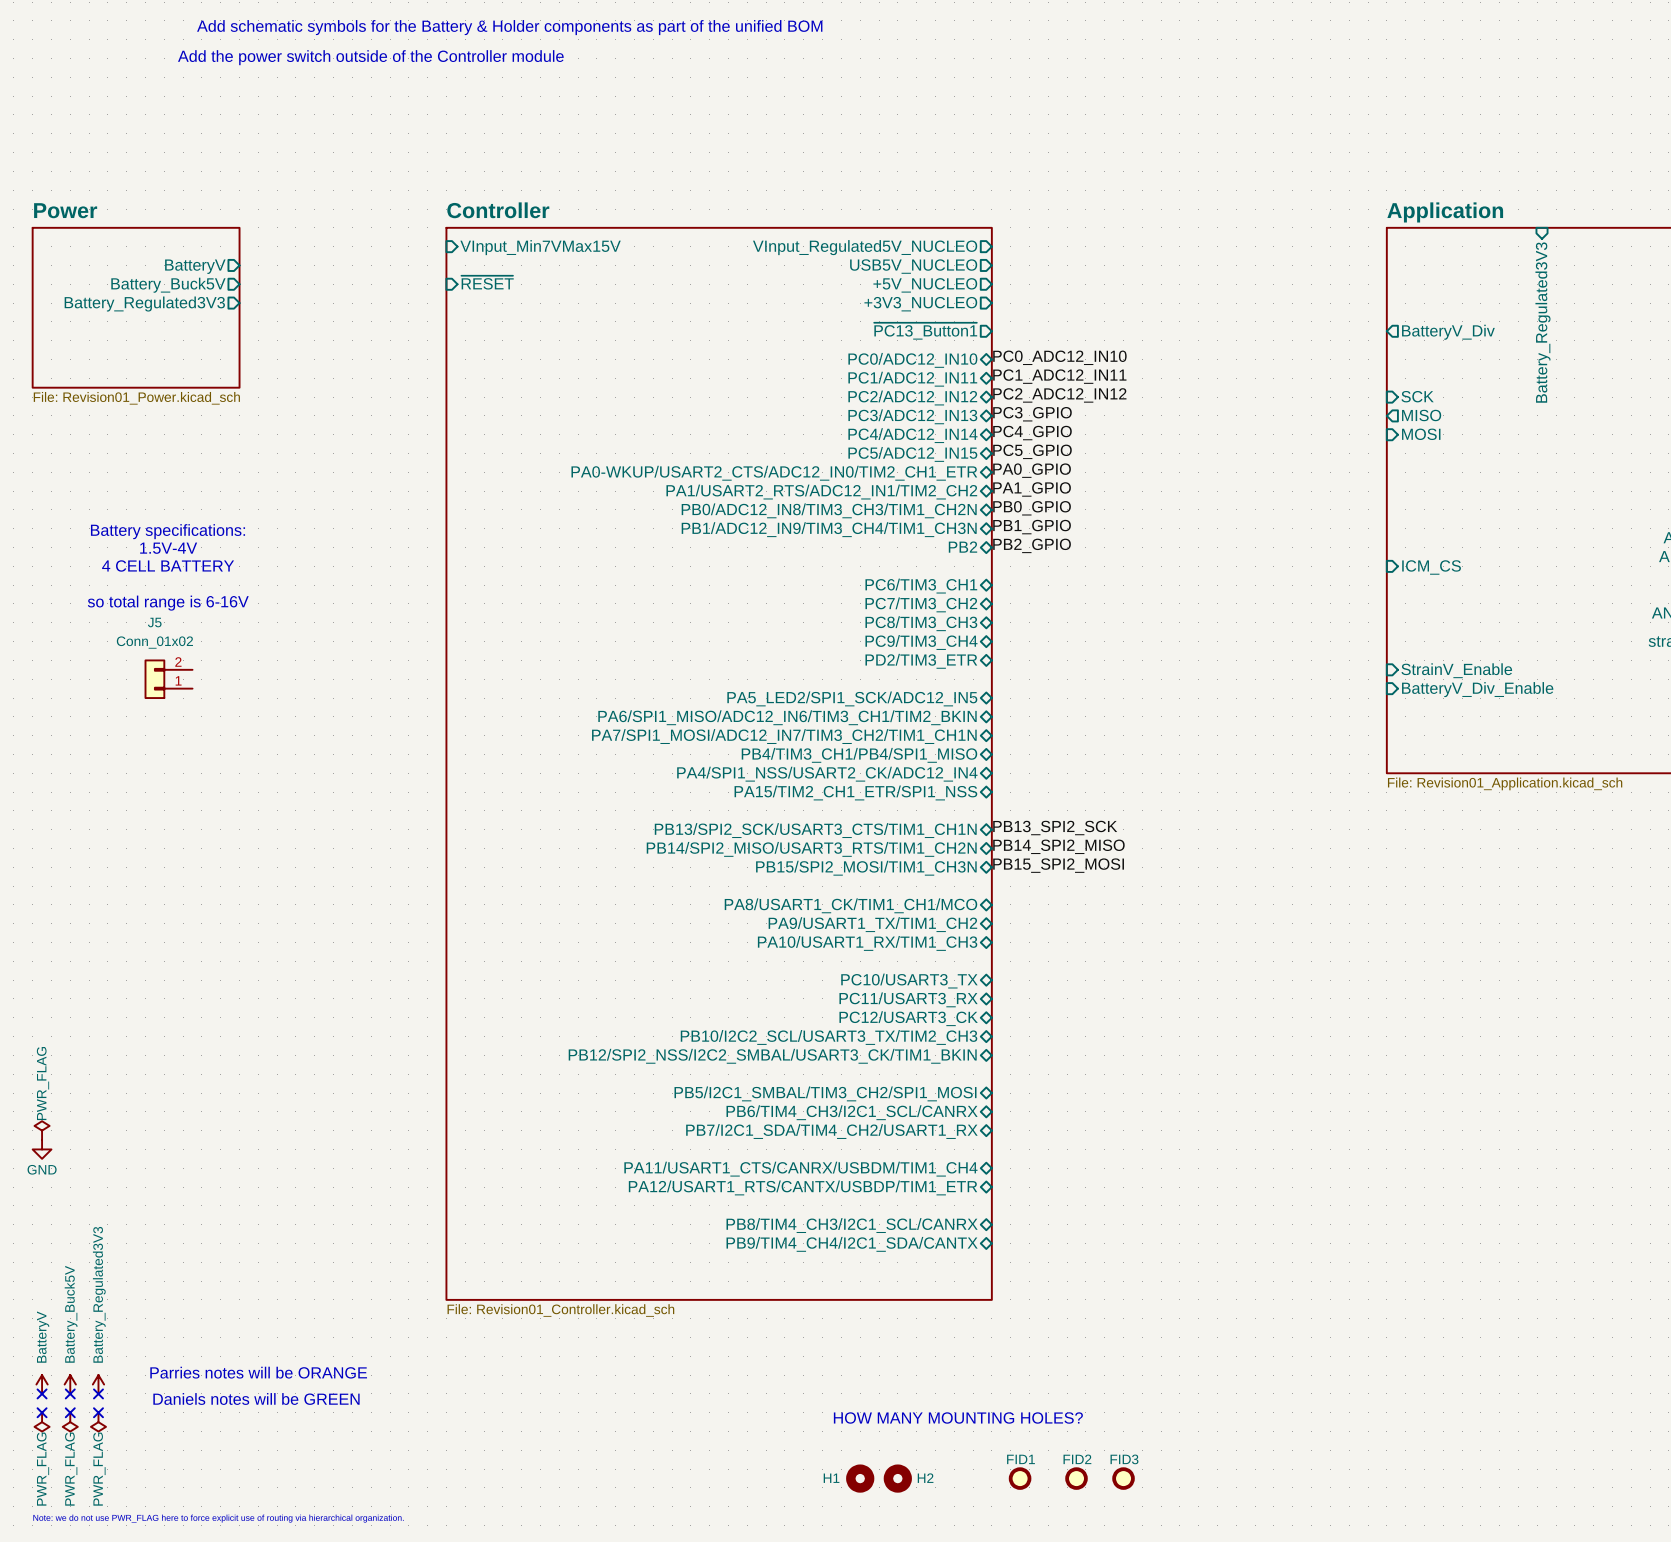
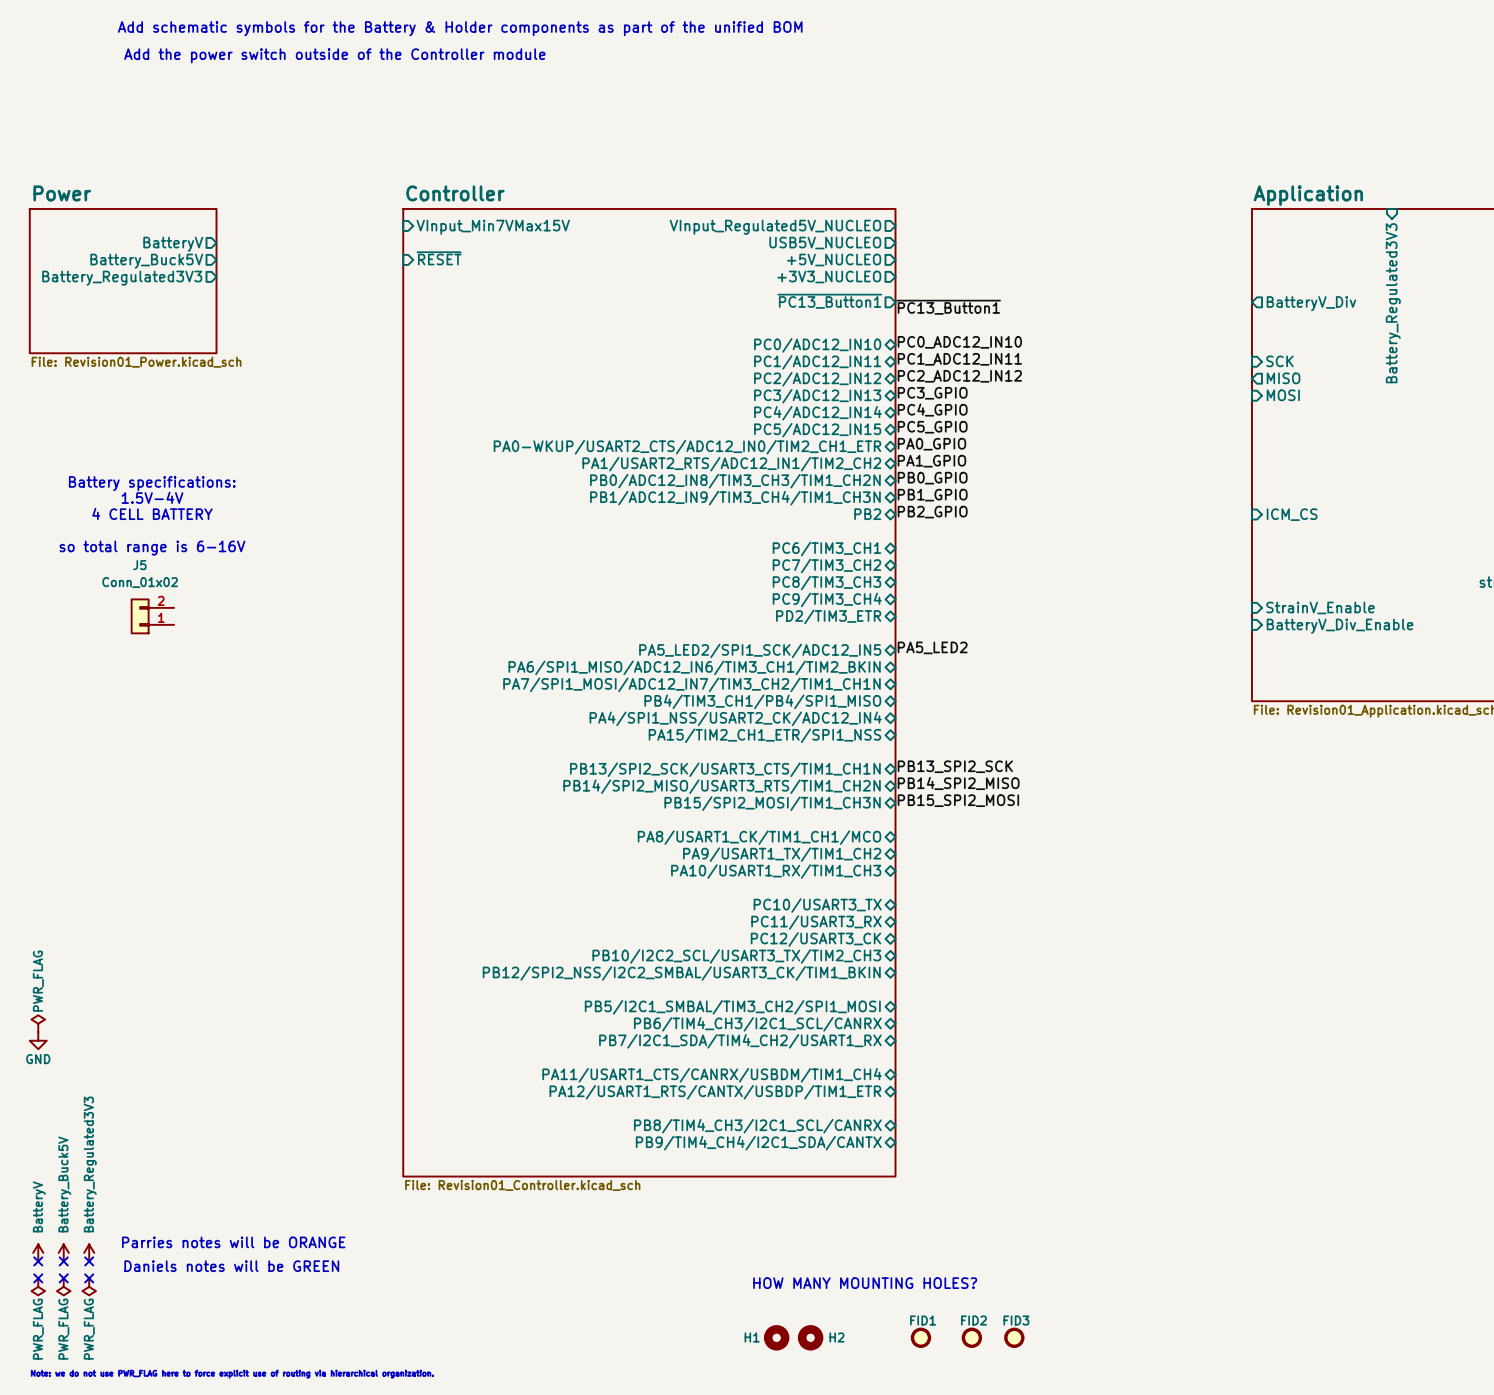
label: none -> ~{PC13_Button1} (948, 307)
label: PC0_ADC12_IN10 (1059, 357) -> none
sheet pin: PC0/ADC12_IN10 (912, 360) -> none
label: PC1_ADC12_IN11 (1059, 376) -> PC0_ADC12_IN10 (959, 342)
sheet pin: PC1/ADC12_IN11 (912, 379) -> PC0/ADC12_IN10 (817, 345)
label: PC2_ADC12_IN12 (1059, 395) -> PC1_ADC12_IN11 (959, 359)
sheet pin: PC2/ADC12_IN12 (912, 398) -> PC1/ADC12_IN11 (817, 362)
label: PC3_GPIO (1032, 414) -> PC2_ADC12_IN12 (959, 376)
sheet pin: PC3/ADC12_IN13 (912, 416) -> PC2/ADC12_IN12 (817, 379)
label: PC4_GPIO (1032, 433) -> PC3_GPIO (932, 393)
sheet pin: PC4/ADC12_IN14 (912, 435) -> PC3/ADC12_IN13 (817, 396)
label: PC5_GPIO (1032, 451) -> PC4_GPIO (932, 410)
sheet pin: PC5/ADC12_IN15 (912, 454) -> PC4/ADC12_IN14 (817, 413)
label: PA0_GPIO (1032, 470) -> PC5_GPIO (932, 427)
sheet pin: PA0-WKUP/USART2_CTS/ADC12_IN0/TIM2_CH1_ETR (774, 473) -> PC5/ADC12_IN15 (817, 430)
label: PA1_GPIO (1032, 489) -> PA0_GPIO (931, 444)
sheet pin: PA1/USART2_RTS/ADC12_IN1/TIM2_CH2 (821, 492) -> PA0-WKUP/USART2_CTS/ADC12_IN0/TIM2_CH1_ETR (687, 447)
label: PB0_GPIO (1032, 508) -> PA1_GPIO (931, 461)
sheet pin: PB0/ADC12_IN8/TIM3_CH3/TIM1_CH2N (829, 510) -> PA1/USART2_RTS/ADC12_IN1/TIM2_CH2 (731, 464)
label: PB1_GPIO (1032, 527) -> PB0_GPIO (932, 478)
sheet pin: PB1/ADC12_IN9/TIM3_CH4/TIM1_CH3N (829, 529) -> PB0/ADC12_IN8/TIM3_CH3/TIM1_CH2N (735, 481)
label: PB2_GPIO (1032, 545) -> PB1_GPIO (932, 495)
sheet pin: PB2 (962, 547) -> PB1/ADC12_IN9/TIM3_CH4/TIM1_CH3N (735, 498)
label: none -> PB2_GPIO (932, 512)
sheet pin: none -> PB2 (867, 514)
sheet pin: PC6/TIM3_CH1 (921, 586) -> none
sheet pin: PC7/TIM3_CH2 (921, 604) -> PC6/TIM3_CH1 (826, 549)
sheet pin: PC8/TIM3_CH3 (921, 623) -> PC7/TIM3_CH2 (826, 566)
sheet pin: PC9/TIM3_CH4 (921, 642) -> PC8/TIM3_CH3 (826, 583)
sheet pin: PD2/TIM3_ETR (921, 661) -> PC9/TIM3_CH4 (827, 599)
sheet pin: none -> PD2/TIM3_ETR (828, 616)
sheet pin: PA5_LED2/SPI1_SCK/ADC12_IN5 (852, 698) -> none
label: none -> PA5_LED2 (932, 647)
sheet pin: PA6/SPI1_MISO/ADC12_IN6/TIM3_CH1/TIM2_BKIN (787, 717) -> PA5_LED2/SPI1_SCK/ADC12_IN5 (760, 650)
sheet pin: PA7/SPI1_MOSI/ADC12_IN7/TIM3_CH2/TIM1_CH1N (784, 736) -> PA6/SPI1_MISO/ADC12_IN6/TIM3_CH1/TIM2_BKIN (694, 667)
sheet pin: PB4/TIM3_CH1/PB4/SPI1_MISO (859, 755) -> PA7/SPI1_MOSI/ADC12_IN7/TIM3_CH2/TIM1_CH1N (692, 684)
sheet pin: PA4/SPI1_NSS/USART2_CK/ADC12_IN4 (827, 774) -> PB4/TIM3_CH1/PB4/SPI1_MISO (762, 701)
sheet pin: PA15/TIM2_CH1_ETR/SPI1_NSS (855, 792) -> PA4/SPI1_NSS/USART2_CK/ADC12_IN4 (735, 718)
sheet pin: none -> PA15/TIM2_CH1_ETR/SPI1_NSS (764, 735)
label: PB13_SPI2_SCK (1055, 828) -> none
sheet pin: PB13/SPI2_SCK/USART3_CTS/TIM1_CH1N (815, 830) -> none
label: PB14_SPI2_MISO (1058, 846) -> PB13_SPI2_SCK (955, 766)
sheet pin: PB14/SPI2_MISO/USART3_RTS/TIM1_CH2N (811, 849) -> PB13/SPI2_SCK/USART3_CTS/TIM1_CH1N (725, 769)
label: PB15_SPI2_MOSI (1058, 865) -> PB14_SPI2_MISO (958, 783)
sheet pin: PB15/SPI2_MOSI/TIM1_CH3N (866, 868) -> PB14/SPI2_MISO/USART3_RTS/TIM1_CH2N (722, 786)
label: none -> PB15_SPI2_MOSI (958, 800)
sheet pin: none -> PB15/SPI2_MOSI/TIM1_CH3N (772, 803)
sheet pin: PA8/USART1_CK/TIM1_CH1/MCO (850, 905) -> none
sheet pin: PA9/USART1_TX/TIM1_CH2 (872, 924) -> PA8/USART1_CK/TIM1_CH1/MCO (759, 837)
sheet pin: PA10/USART1_RX/TIM1_CH3 (867, 943) -> PA9/USART1_TX/TIM1_CH2 (782, 854)
sheet pin: none -> PA10/USART1_RX/TIM1_CH3 (776, 871)
sheet pin: PC10/USART3_TX (909, 981) -> none
sheet pin: PC11/USART3_RX (908, 999) -> PC10/USART3_TX (817, 905)
sheet pin: PC12/USART3_CK (908, 1018) -> PC11/USART3_RX (816, 922)
sheet pin: PB10/I2C2_SCL/USART3_TX/TIM2_CH3 (829, 1037) -> PC12/USART3_CK (816, 939)
sheet pin: PB12/SPI2_NSS/I2C2_SMBAL/USART3_CK/TIM1_BKIN (772, 1056) -> PB10/I2C2_SCL/USART3_TX/TIM2_CH3 (736, 956)
sheet pin: none -> PB12/SPI2_NSS/I2C2_SMBAL/USART3_CK/TIM1_BKIN (681, 973)
sheet pin: PB5/I2C1_SMBAL/TIM3_CH2/SPI1_MOSI (825, 1093) -> none
sheet pin: PB6/TIM4_CH3/I2C1_SCL/CANRX (852, 1112) -> PB5/I2C1_SMBAL/TIM3_CH2/SPI1_MOSI (732, 1007)
sheet pin: PB7/I2C1_SDA/TIM4_CH2/USART1_RX (831, 1131) -> PB6/TIM4_CH3/I2C1_SCL/CANRX (757, 1024)
sheet pin: none -> PB7/I2C1_SDA/TIM4_CH2/USART1_RX (740, 1041)
sheet pin: PA11/USART1_CTS/CANRX/USBDM/TIM1_CH4 (800, 1169) -> none
sheet pin: PA12/USART1_RTS/CANTX/USBDP/TIM1_ETR (803, 1187) -> PA11/USART1_CTS/CANRX/USBDM/TIM1_CH4 (712, 1075)
sheet pin: none -> PA12/USART1_RTS/CANTX/USBDP/TIM1_ETR (715, 1092)
sheet pin: PB8/TIM4_CH3/I2C1_SCL/CANRX (852, 1225) -> none
sheet pin: PB9/TIM4_CH4/I2C1_SDA/CANTX (852, 1244) -> PB8/TIM4_CH3/I2C1_SCL/CANRX (757, 1126)
sheet pin: none -> PB9/TIM4_CH4/I2C1_SDA/CANTX (758, 1143)

